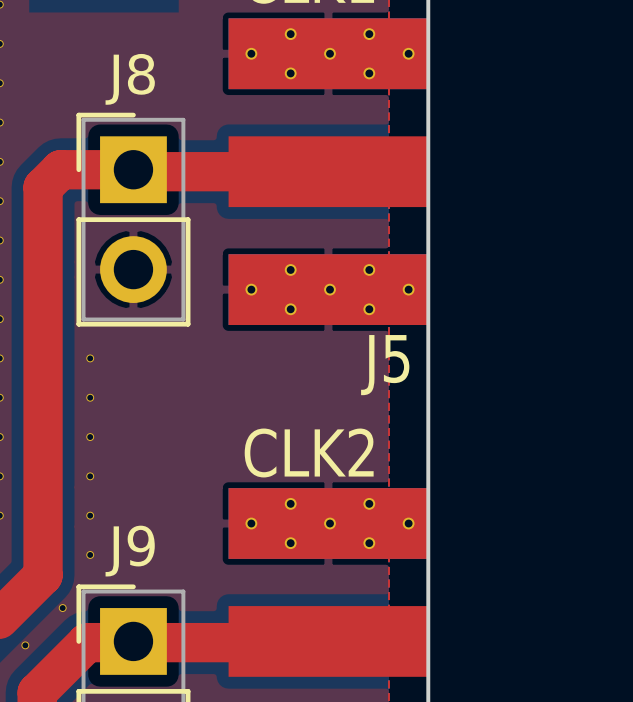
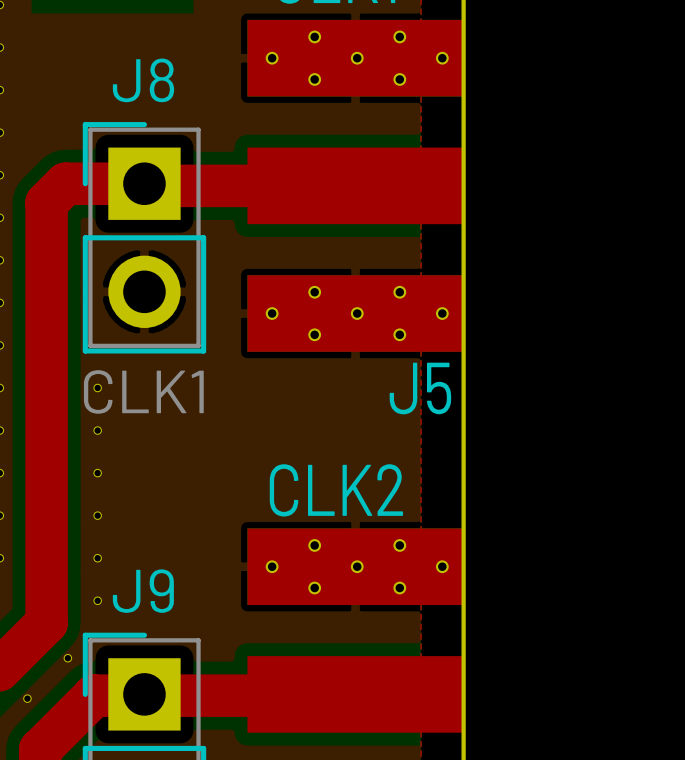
J8 value: none -> CLK1 (143, 391)

